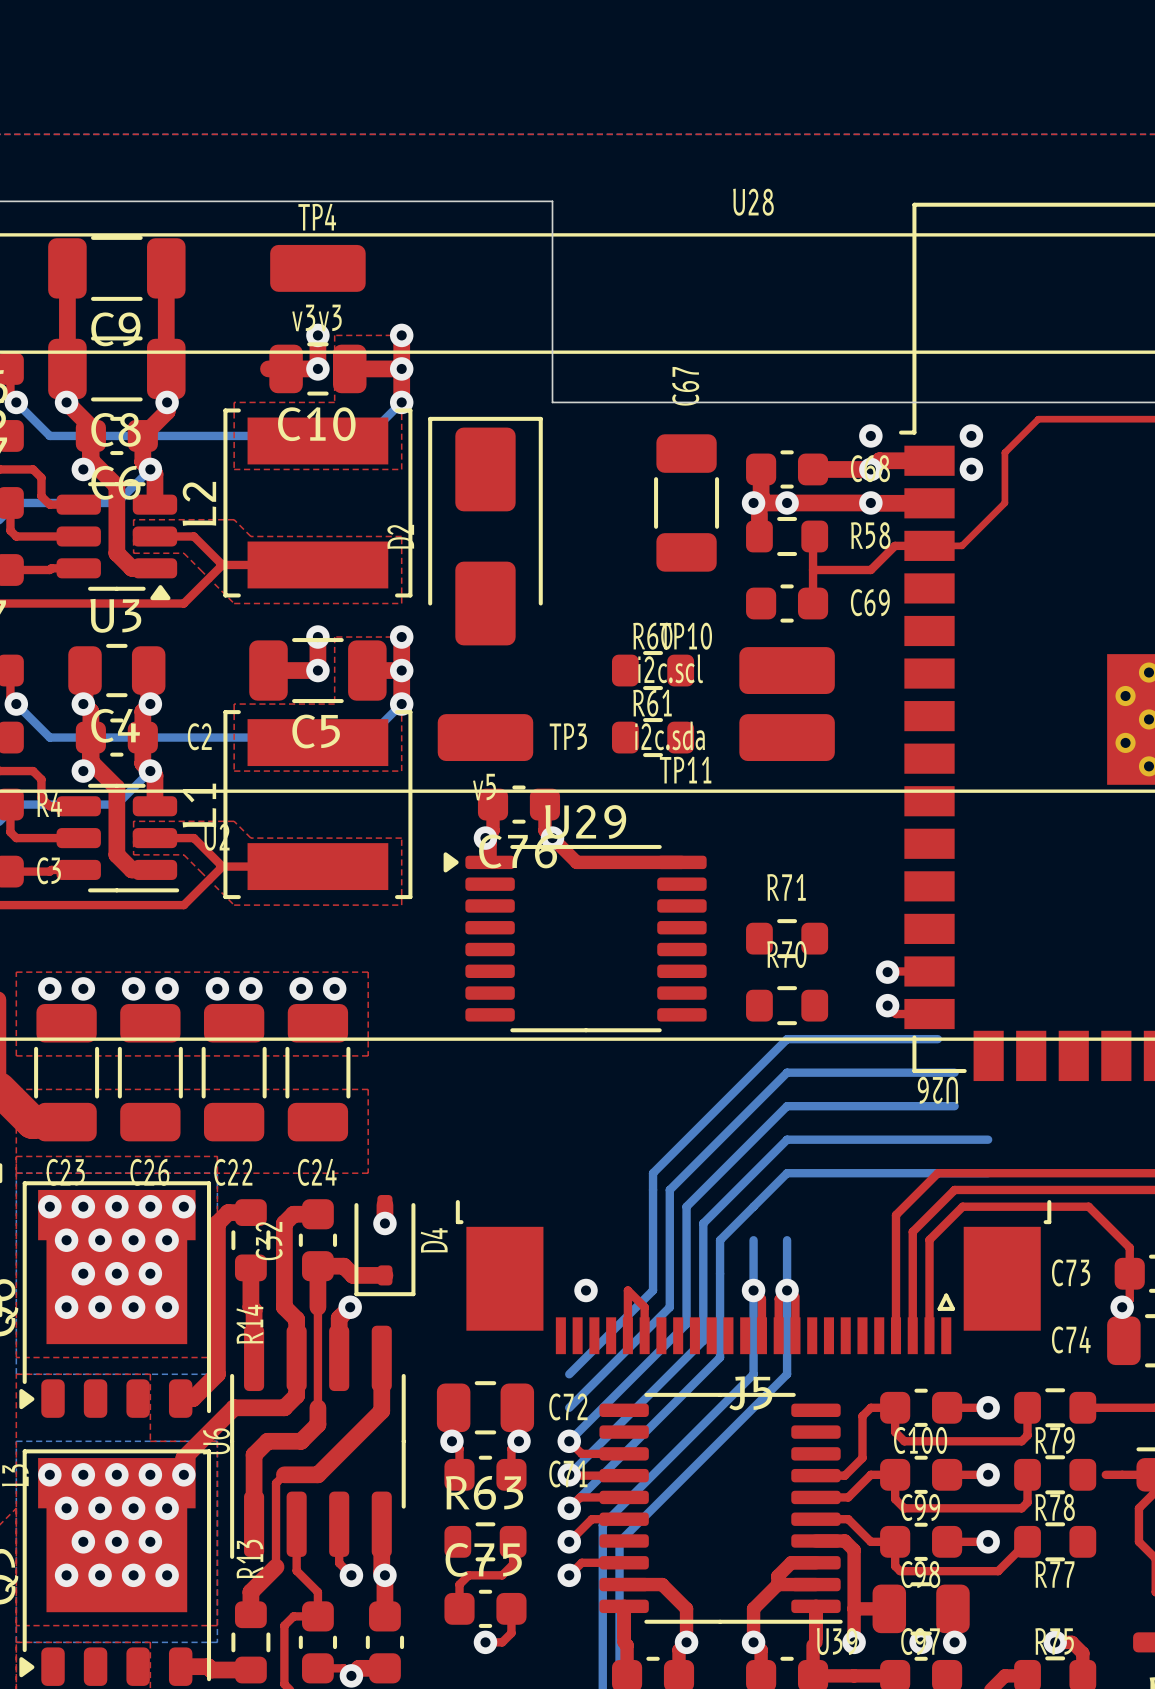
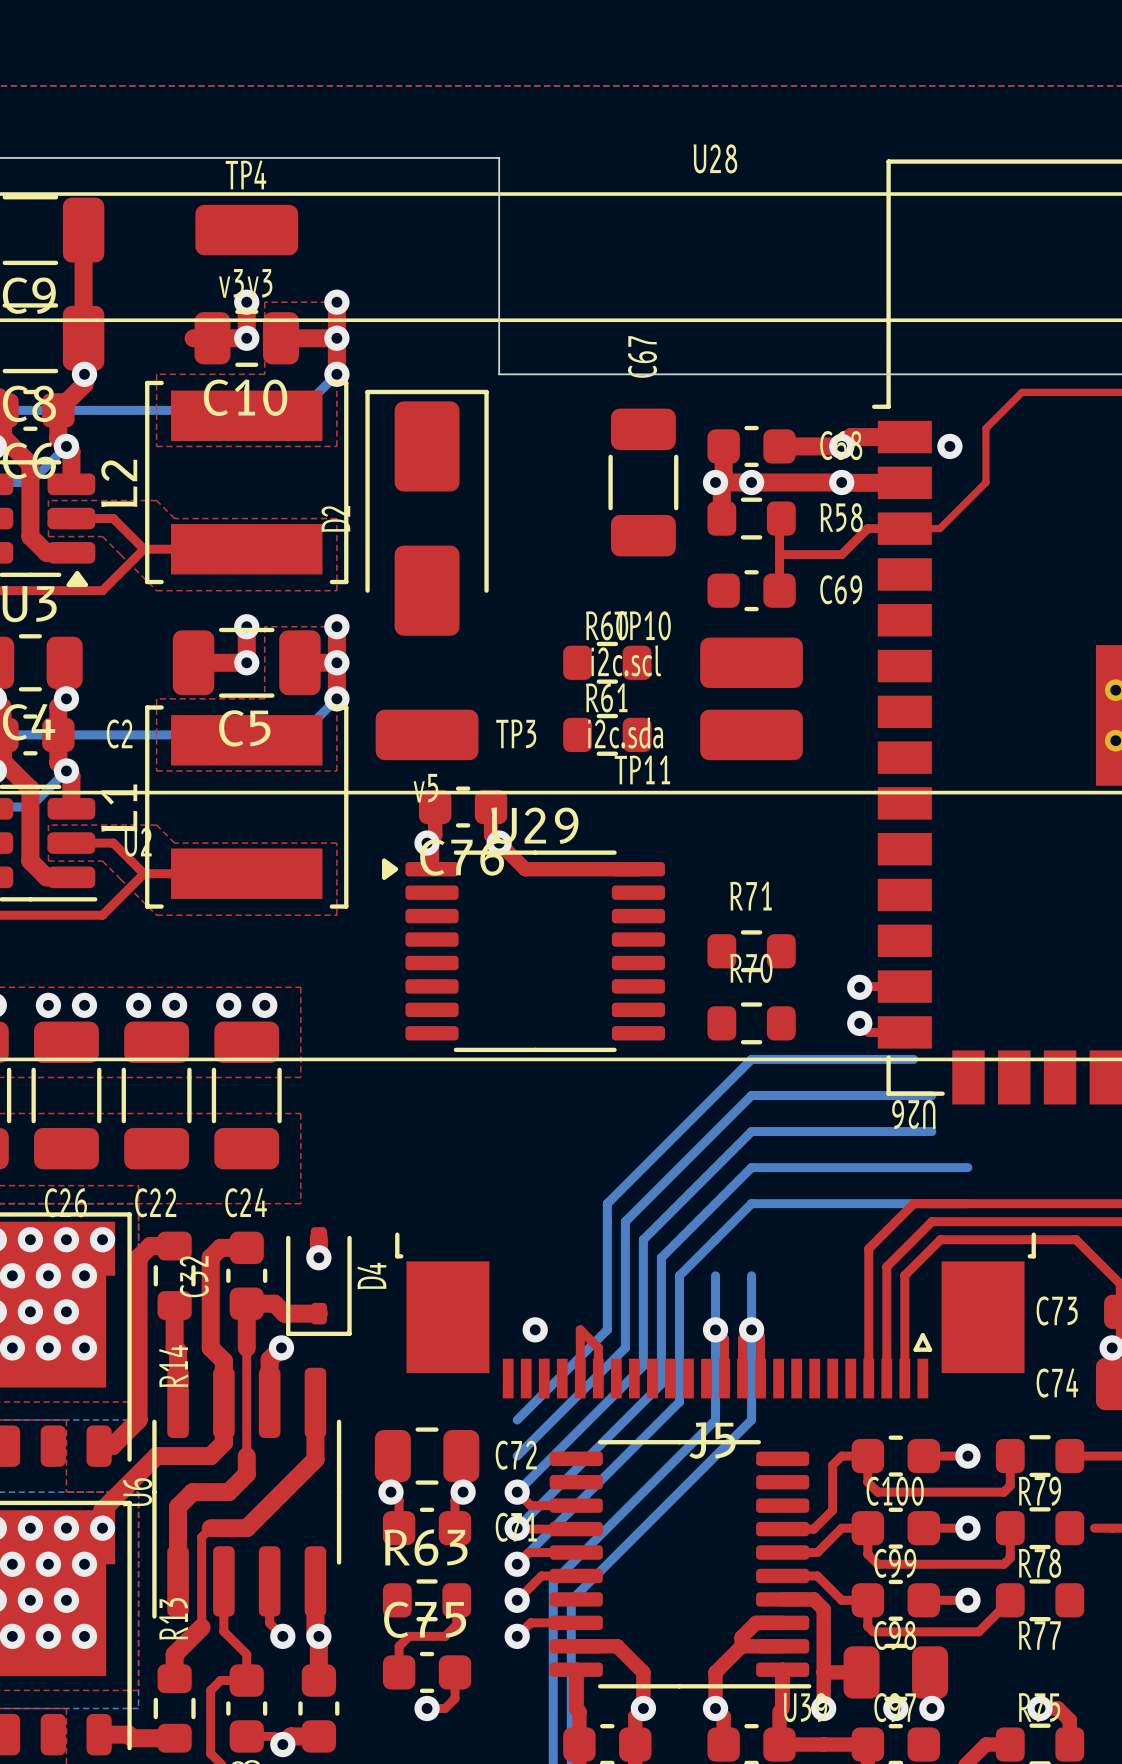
via: (870, 435) -> none
via: (971, 435) -> none

